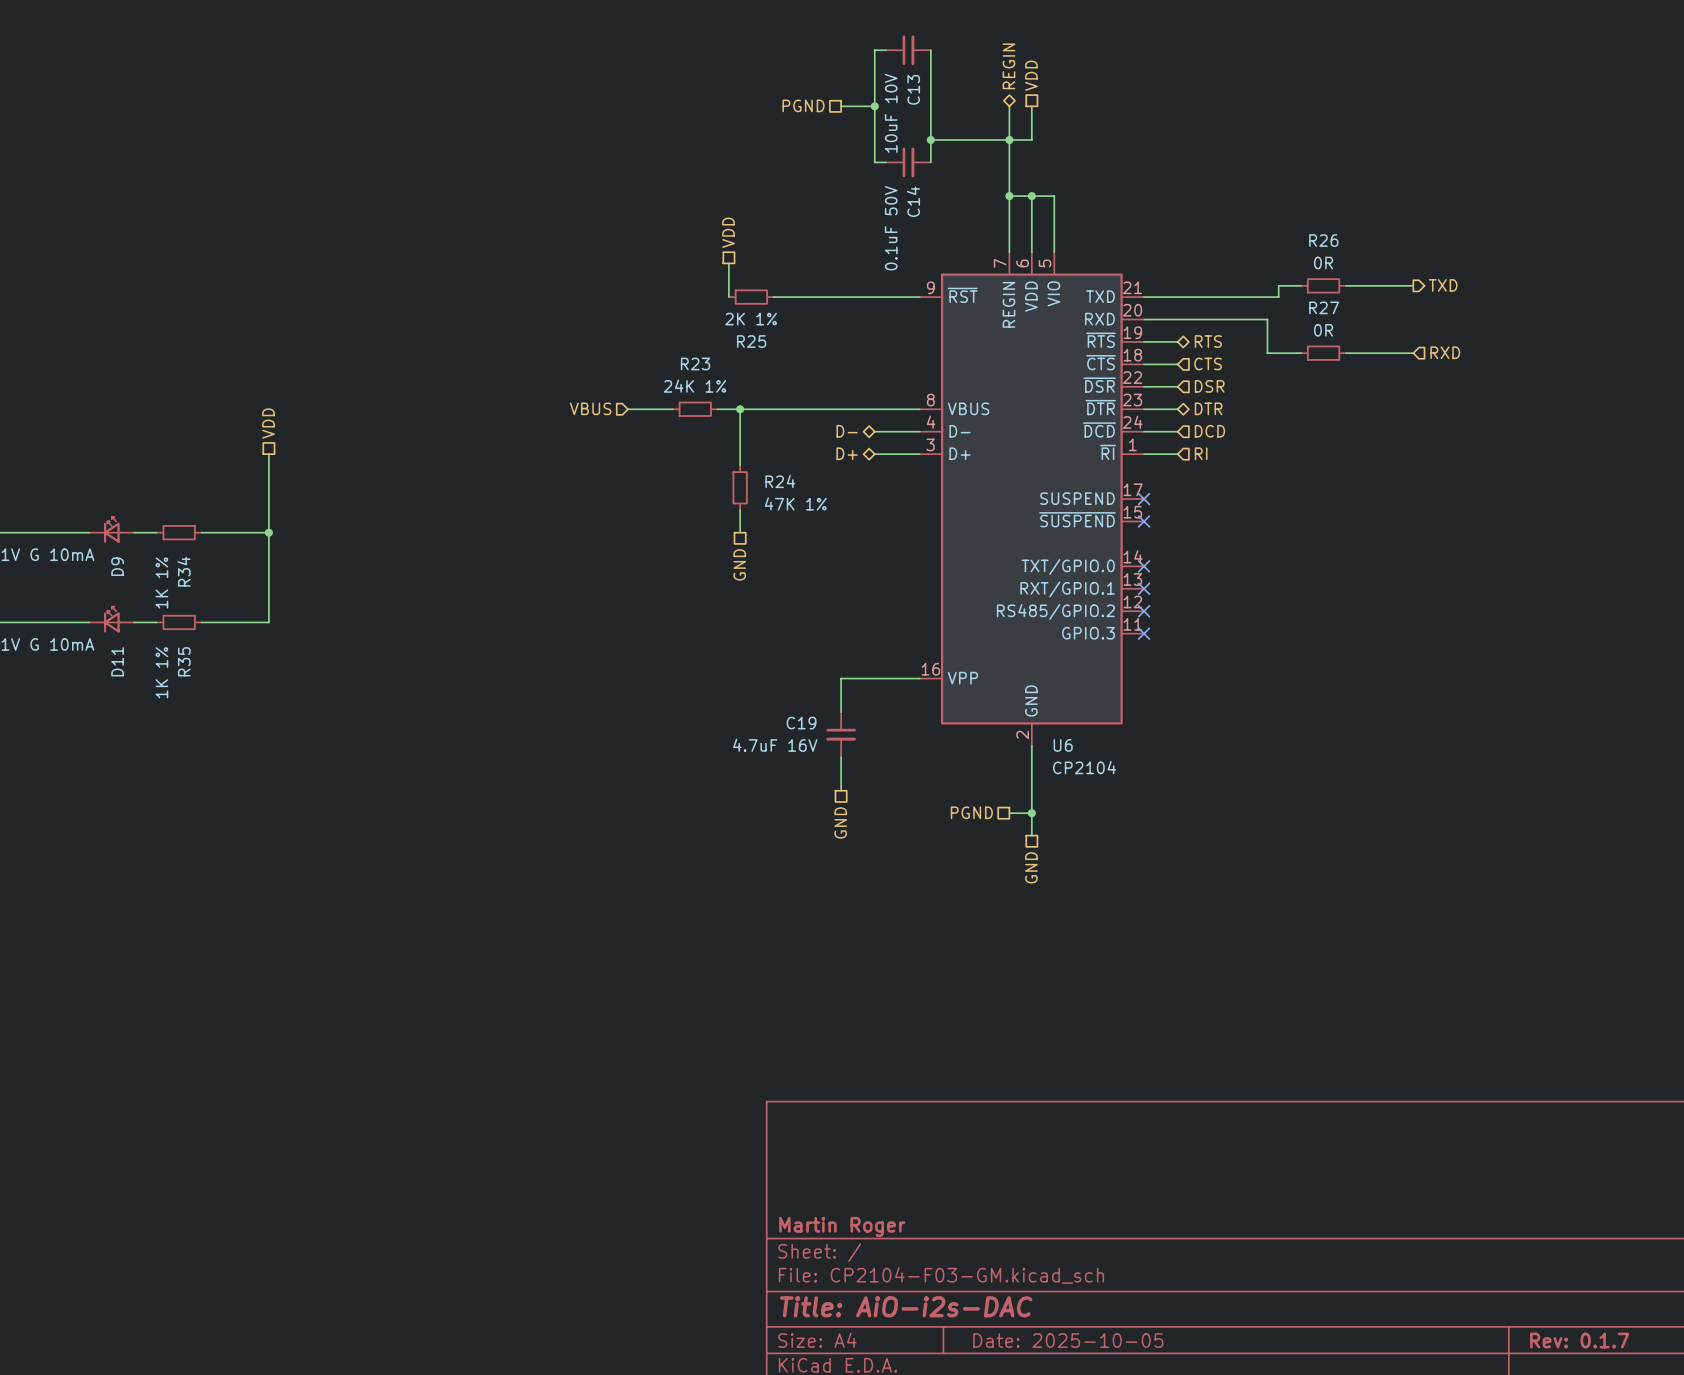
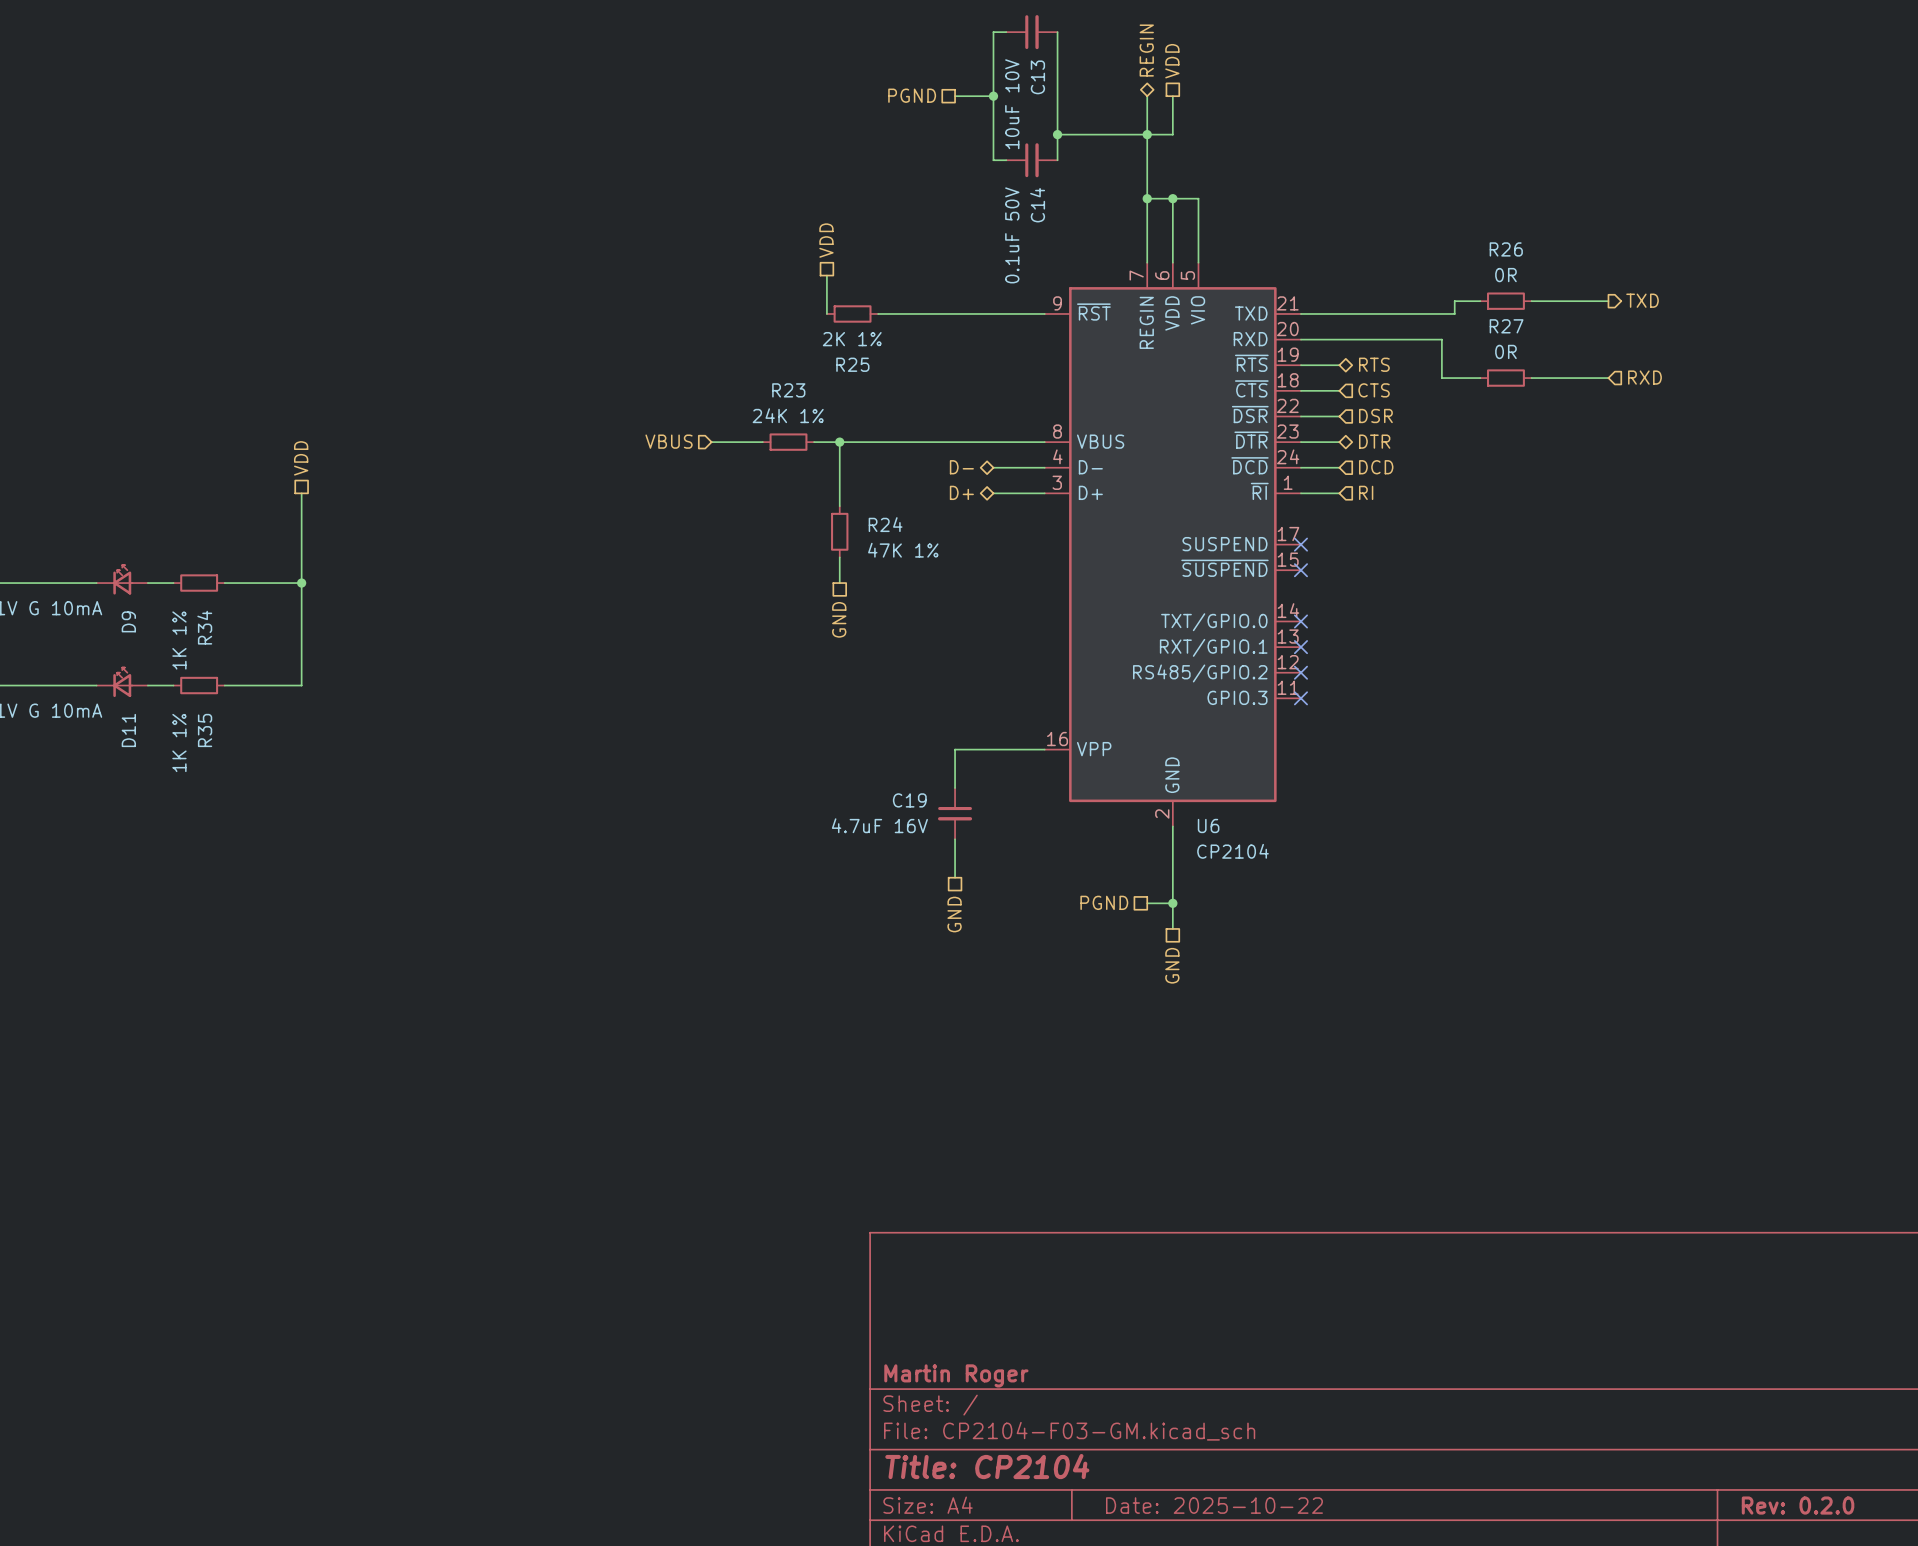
title block: Title: AiO-i2s-DAC (906, 1306) -> Title: CP2104 (987, 1466)
title block: Date: 2025-10-05 (1068, 1340) -> Date: 2025-10-22 (1214, 1505)
title block: Rev: 0.1.7 (1579, 1340) -> Rev: 0.2.0 (1798, 1505)

